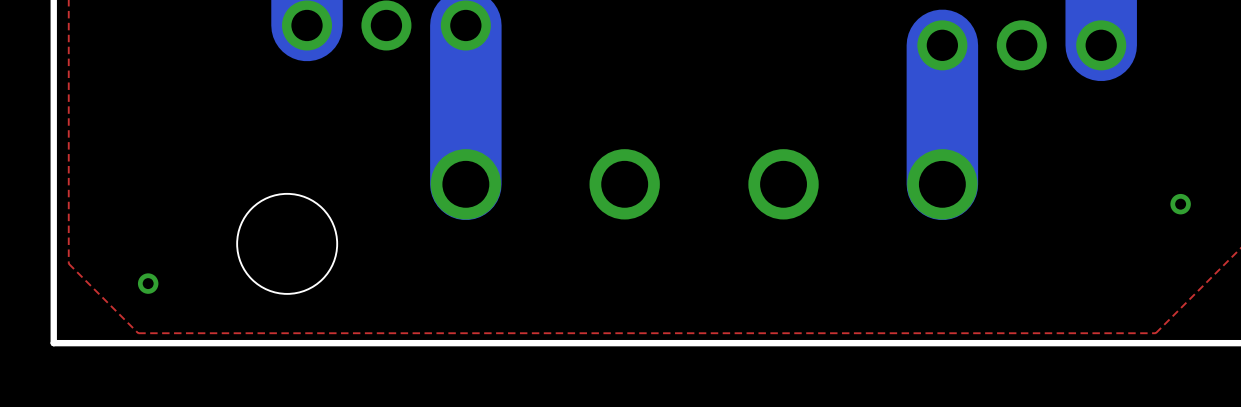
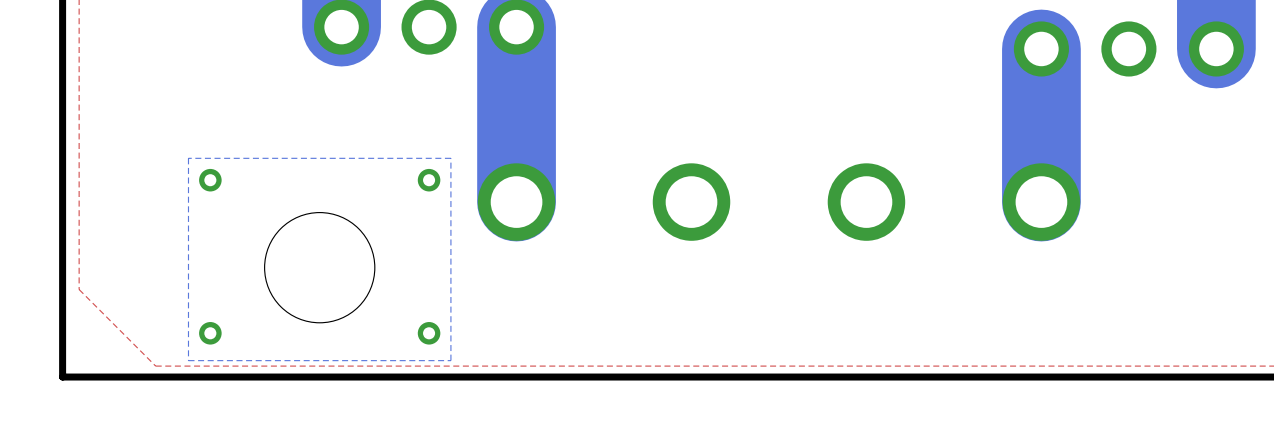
bottom zone outline: none -> (450, 158) (450, 360) (188, 360) (188, 158) (450, 158)
via: none -> (210, 180)
via: none -> (429, 180)
via position: (148, 283) -> (210, 333)
via: none -> (429, 333)

